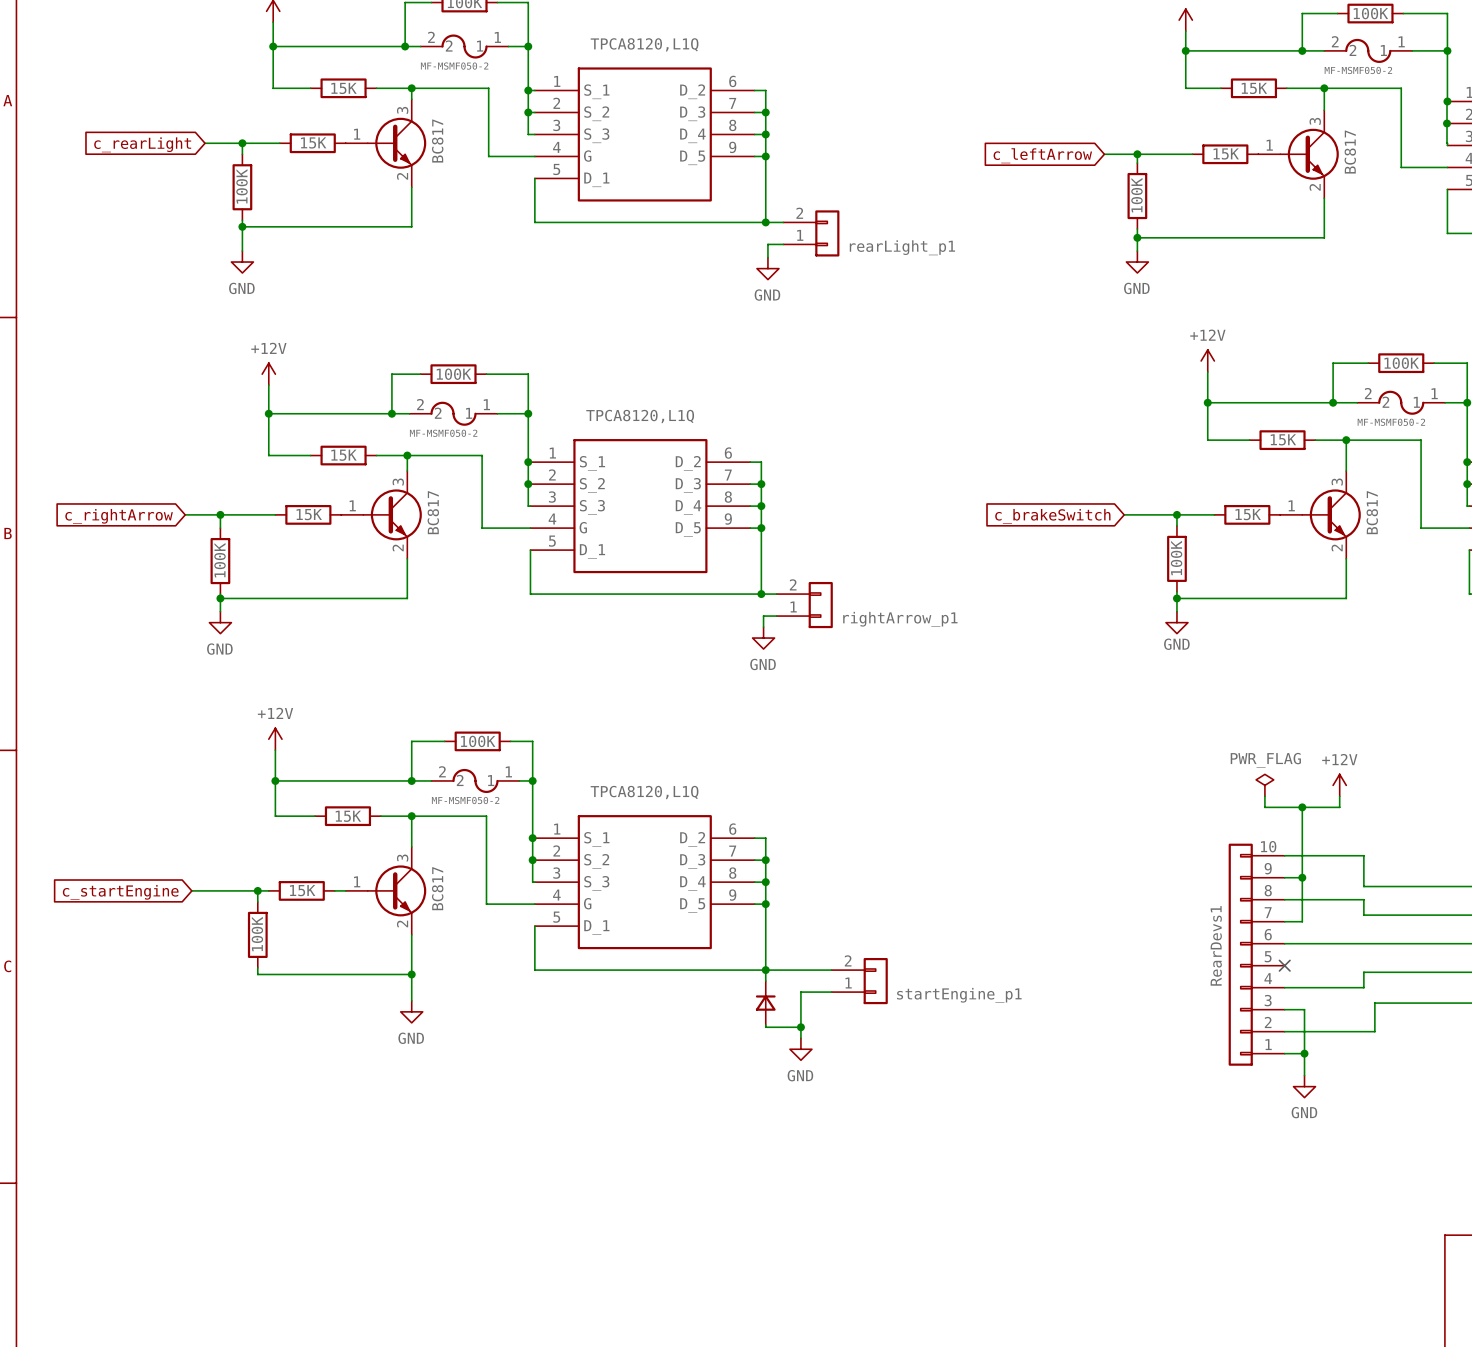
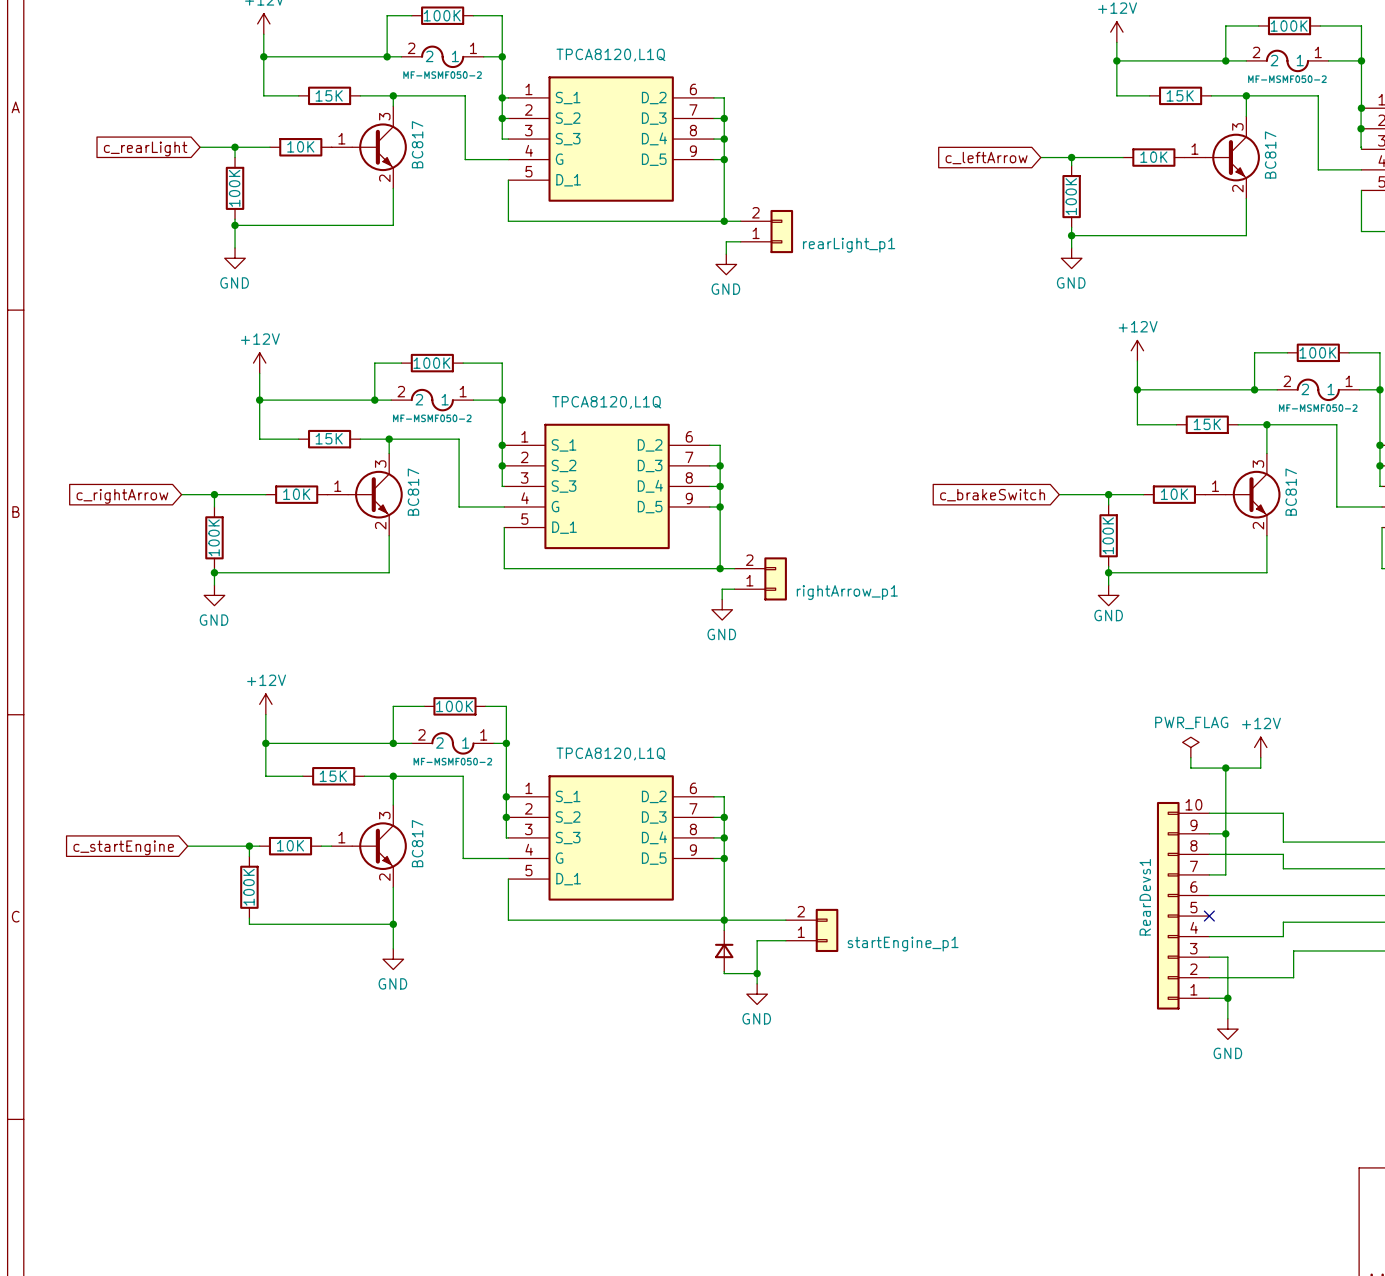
part value: 15K (313, 142) -> 10K (300, 146)
part value: 15K (1226, 153) -> 10K (1153, 157)
part value: 15K (309, 514) -> 10K (296, 494)
part value: 15K (1248, 514) -> 10K (1174, 494)
part value: 15K (302, 890) -> 10K (290, 845)

